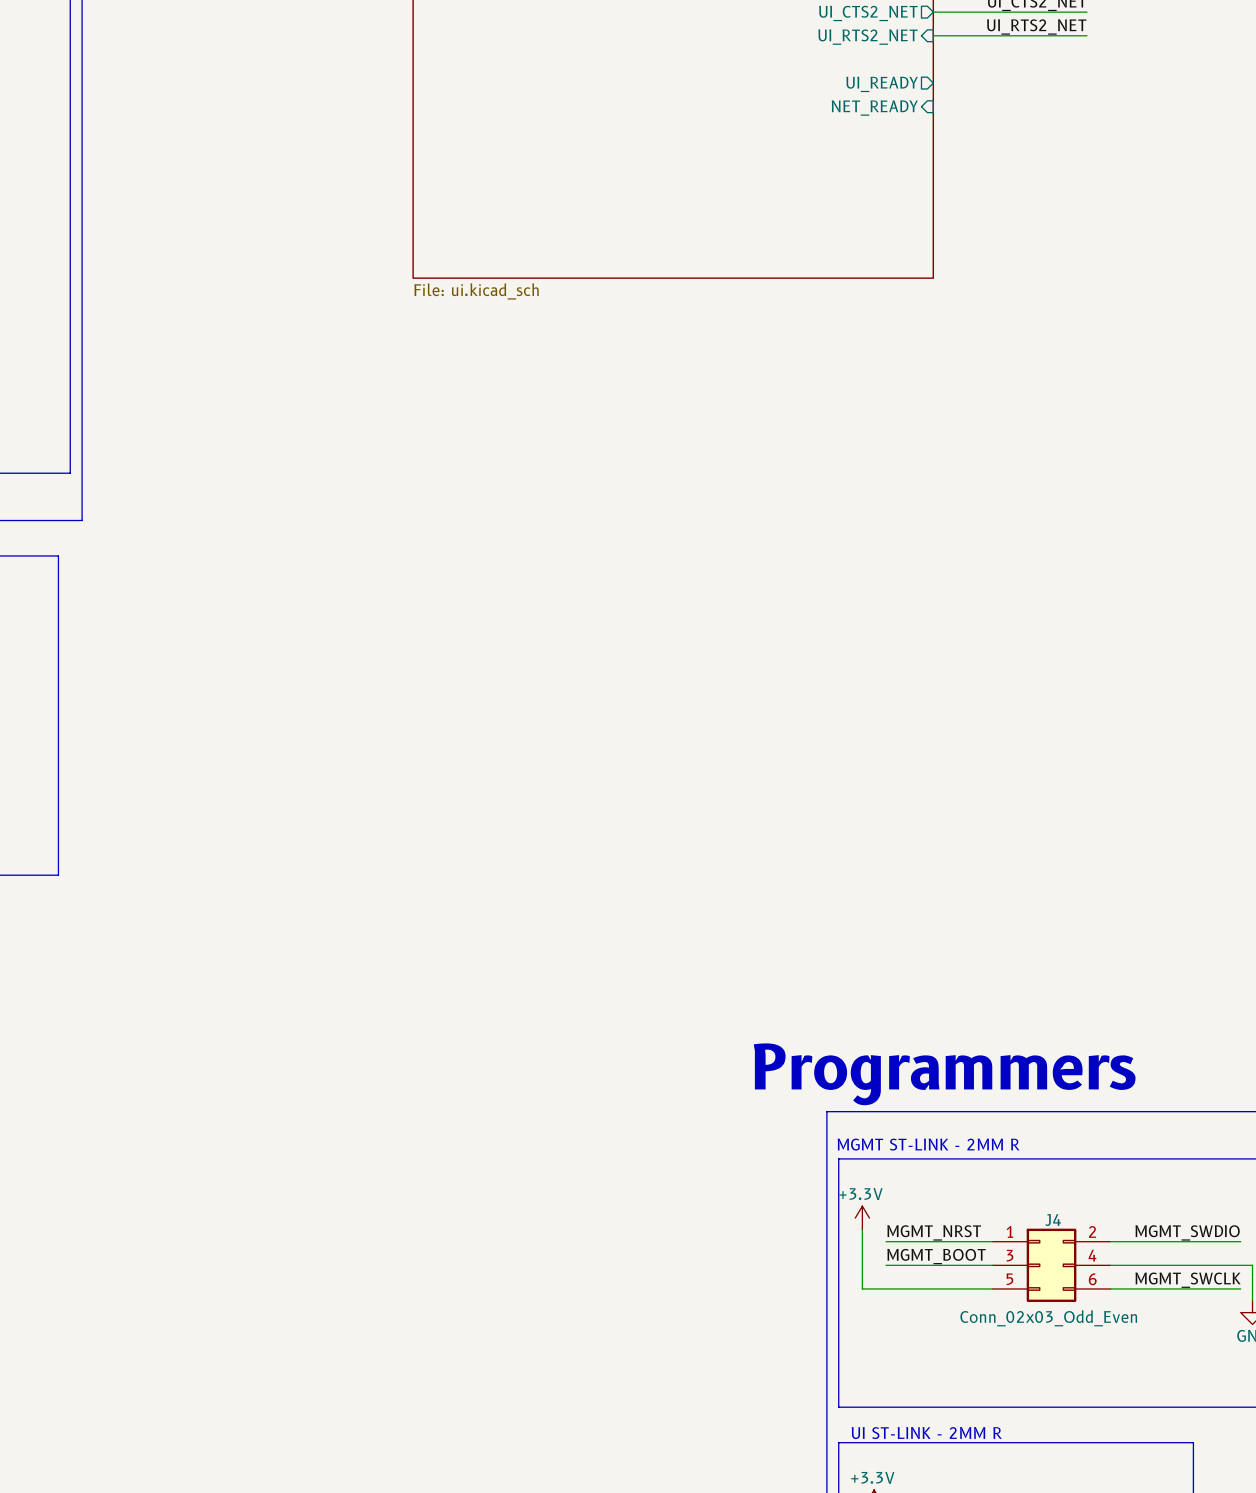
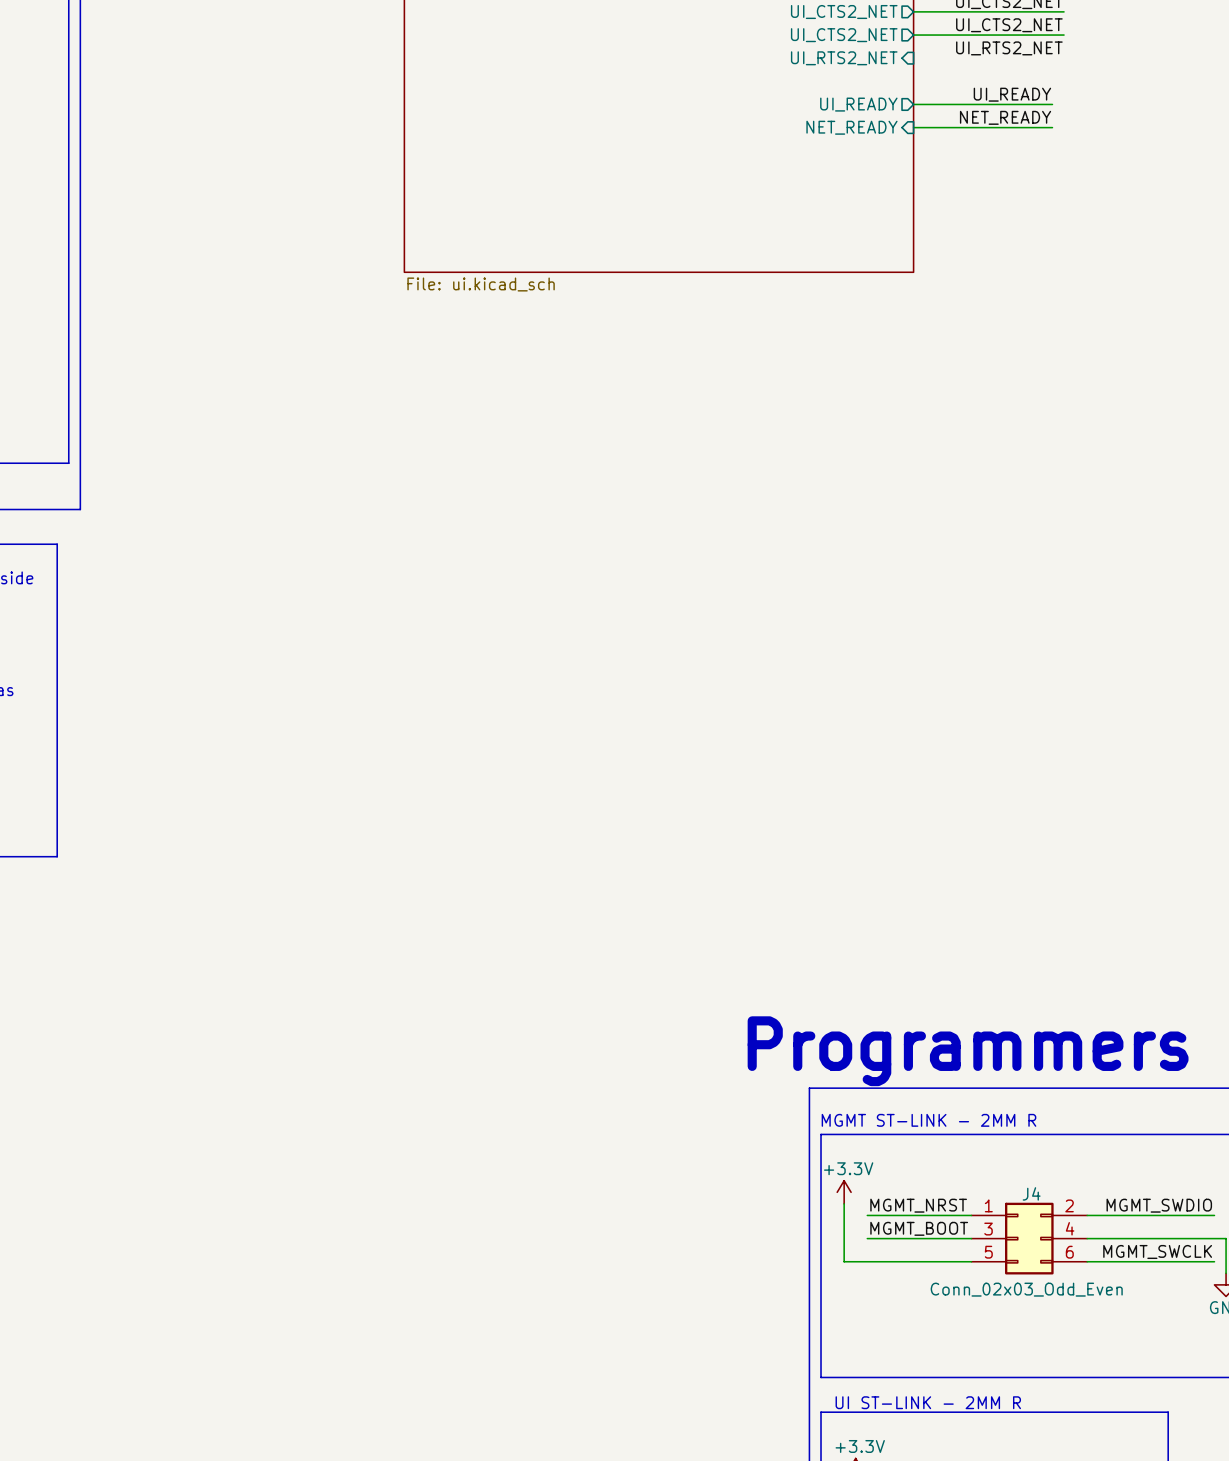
label: UI_RTS2_NET (1036, 27) -> UI_CTS2_NET (1009, 25)
sheet pin shape: input (867, 37) -> output (844, 35)
sheet pin: UI_RTS2_NET (867, 37) -> UI_CTS2_NET (844, 35)
label: none -> UI_RTS2_NET (1009, 48)
sheet pin: none -> UI_RTS2_NET (844, 58)
sheet pin: UI_READY (882, 84) -> none
label: none -> UI_READY (1012, 94)
wire: none -> (913, 104) (1052, 104)
sheet pin shape: input (874, 108) -> output (858, 104)
sheet pin: NET_READY (874, 108) -> UI_READY (858, 104)
label: none -> NET_READY (1005, 117)
wire: none -> (913, 127) (1052, 127)
sheet pin: none -> NET_READY (851, 127)

